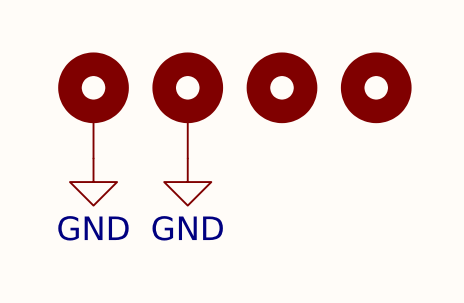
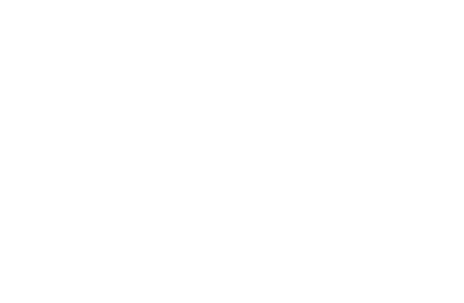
part: (281, 87) -> none
part: (376, 87) -> none
part: (93, 105) -> none
part: (187, 105) -> none
power symbol: GND (93, 182) -> none
power symbol: GND (187, 182) -> none

